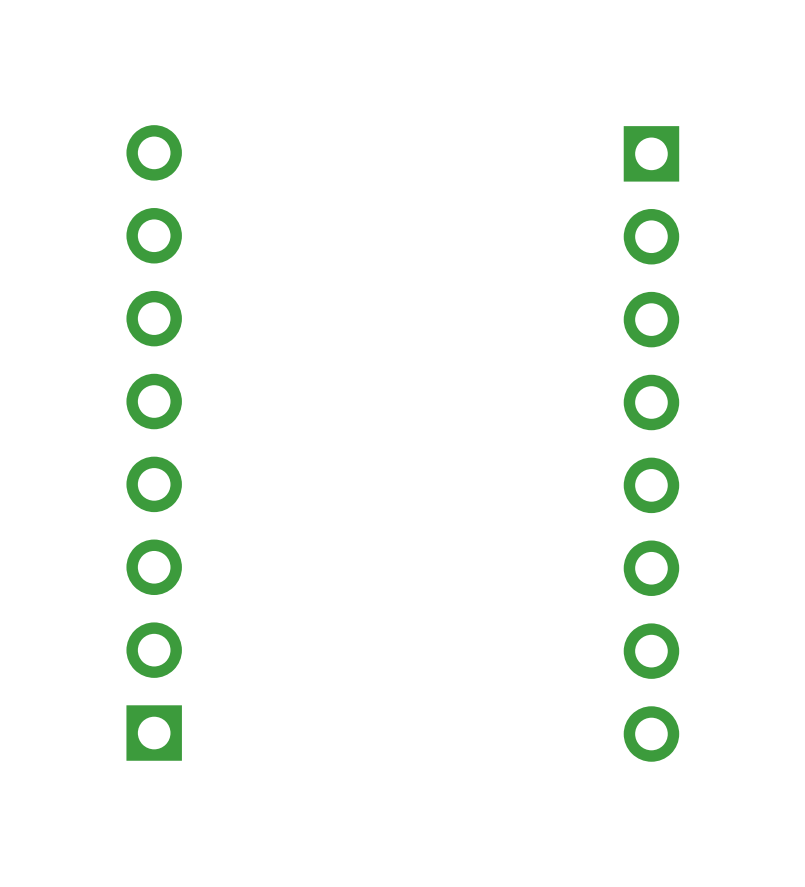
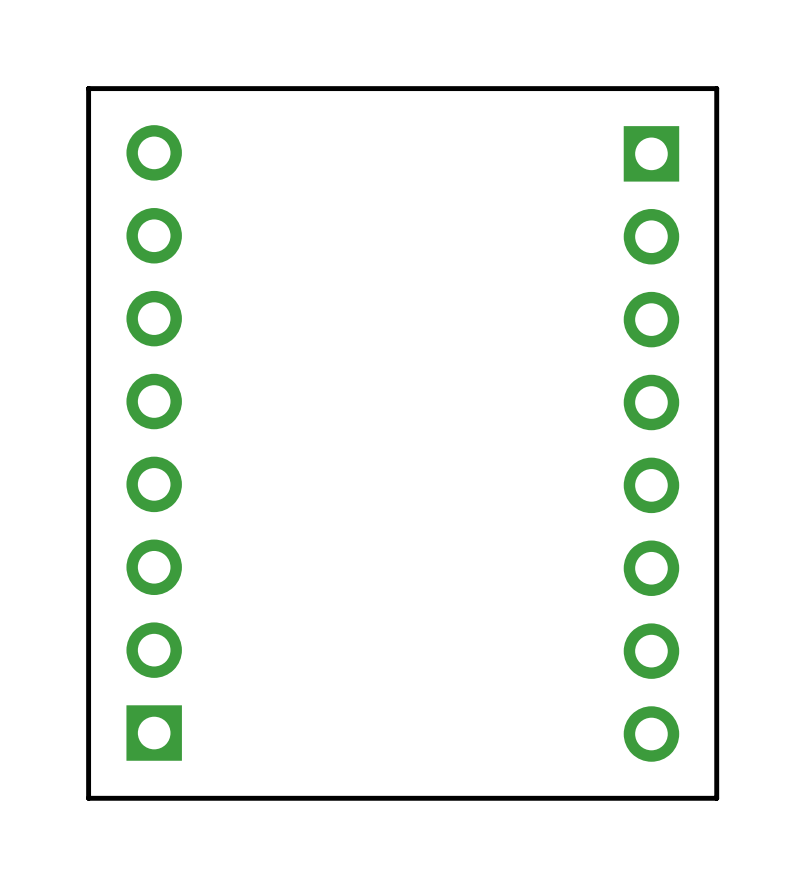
board edge: none -> (716, 88) (716, 798) (88, 798) (88, 88) (716, 88)

